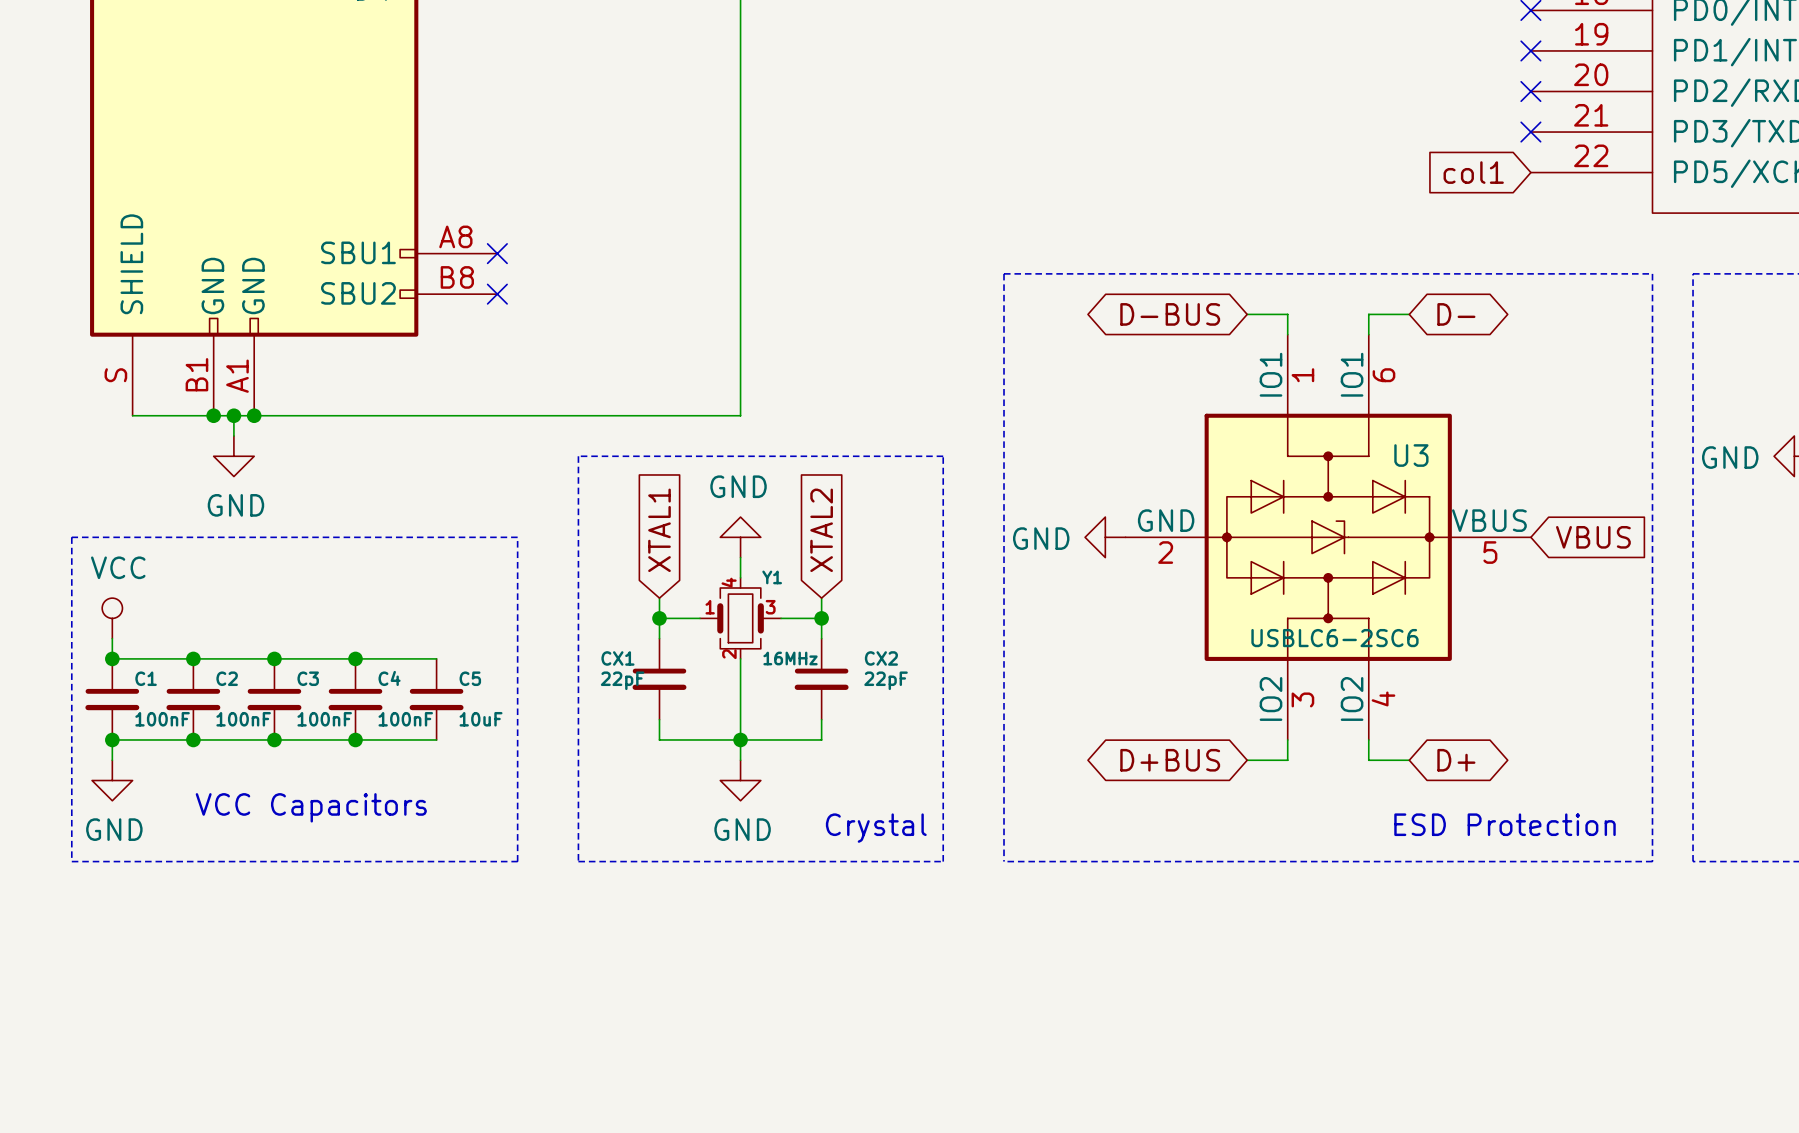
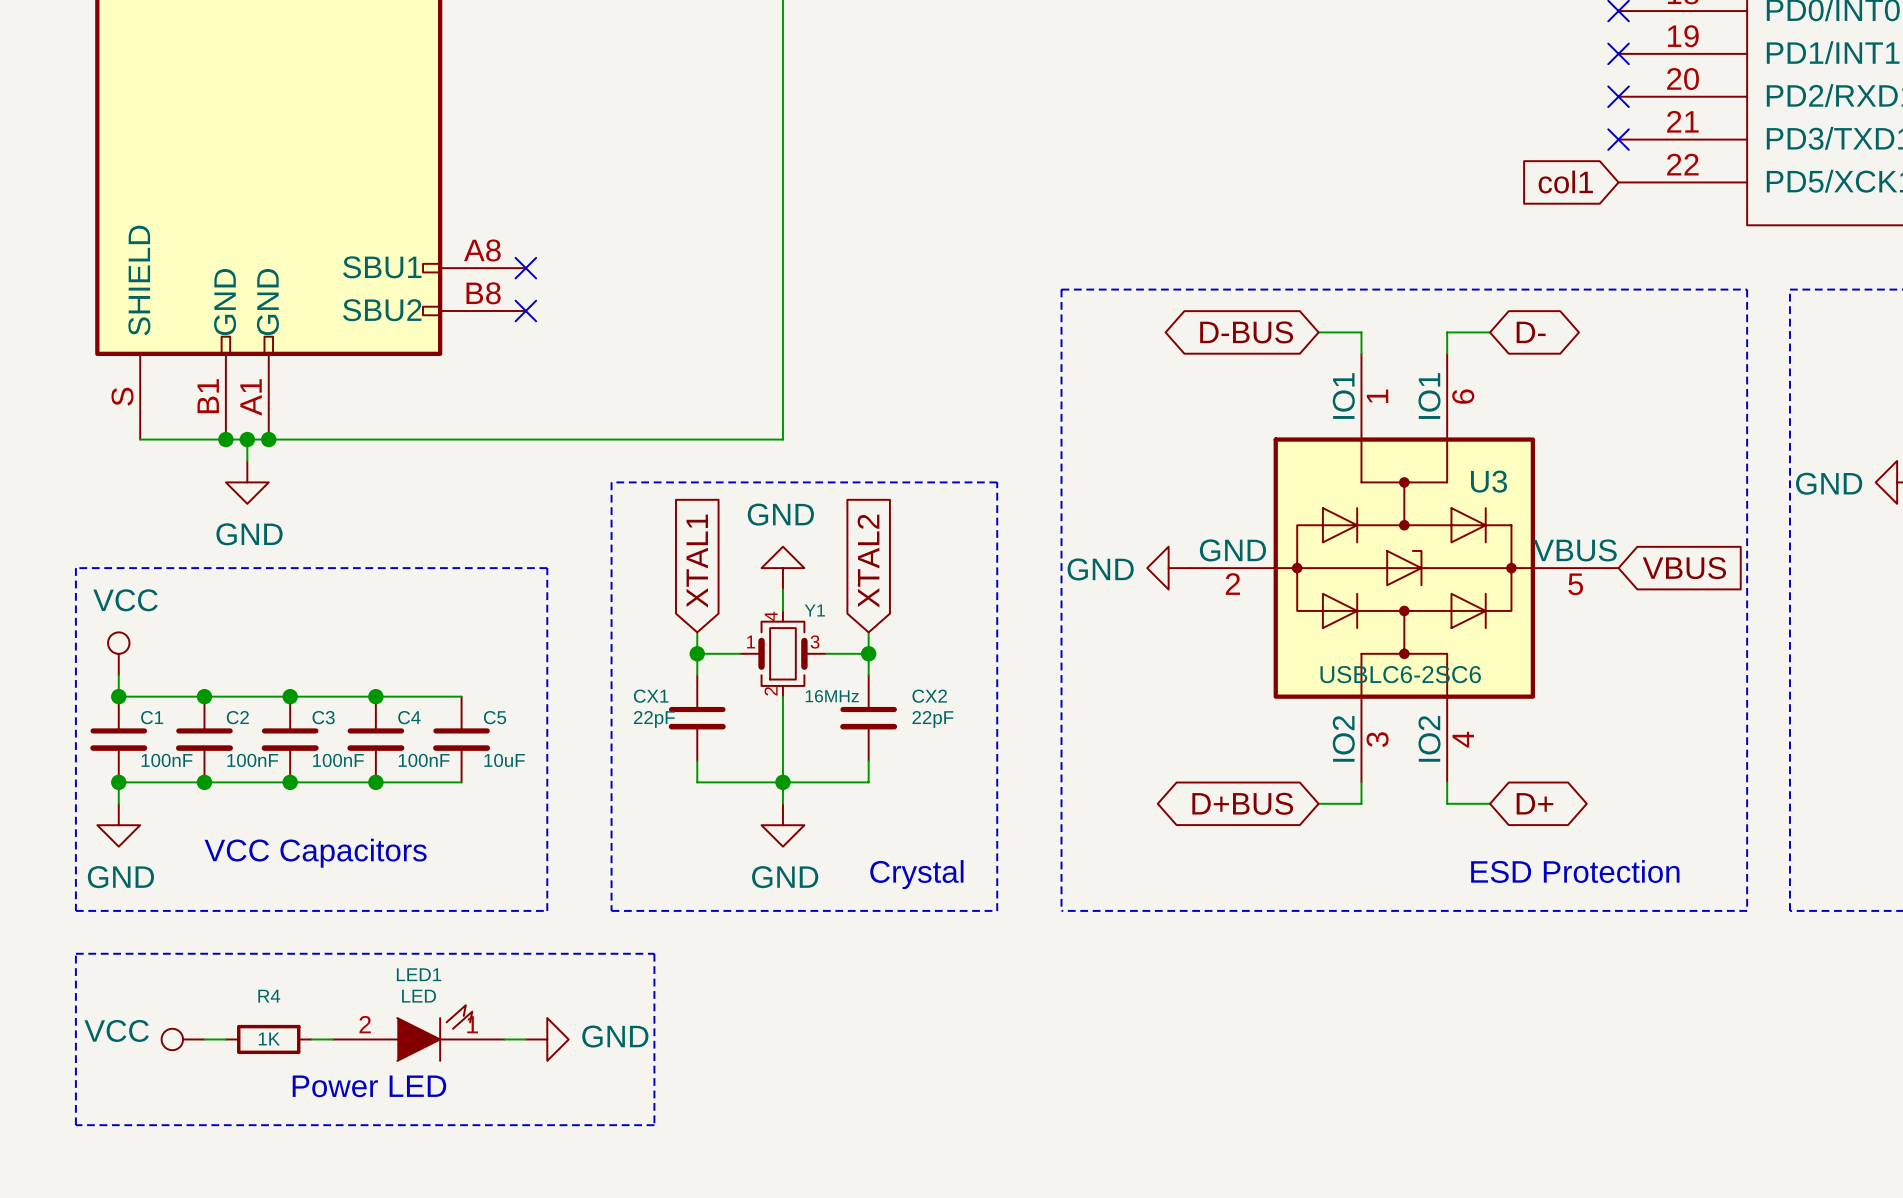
line: none -> (75, 953) (75, 1125) (654, 1125) (654, 953) (75, 953)
LED1: none -> LED (418, 1033)
power symbol: none -> VCC (183, 1039)
wire: none -> (204, 1039) (225, 1039)
R4: none -> 1K (268, 1039)
wire: none -> (311, 1039) (333, 1039)
wire: none -> (504, 1039) (525, 1039)
power symbol: none -> GND (547, 1039)
text: none -> Power LED (369, 1086)

